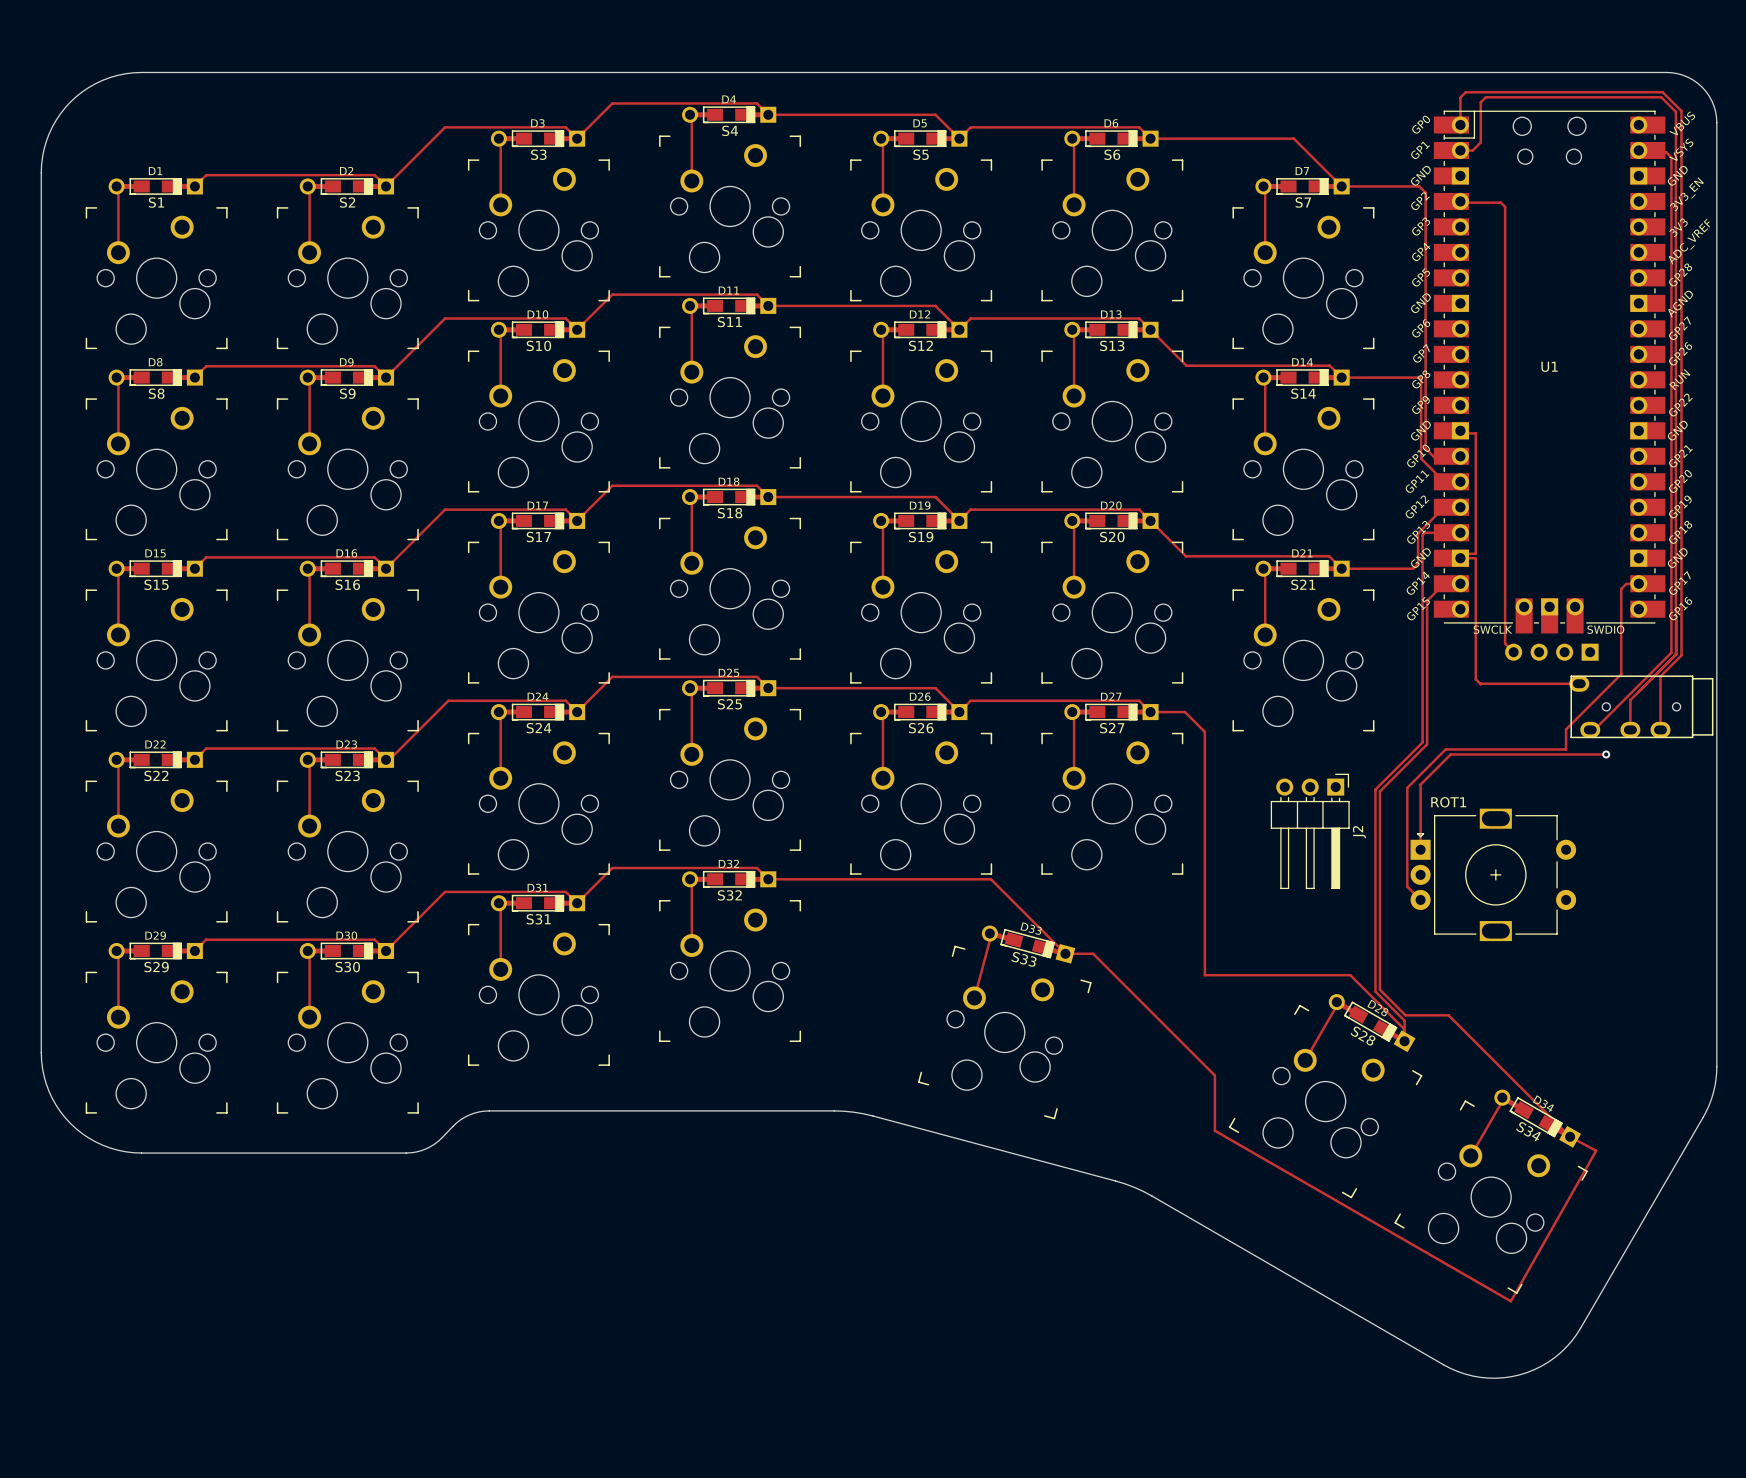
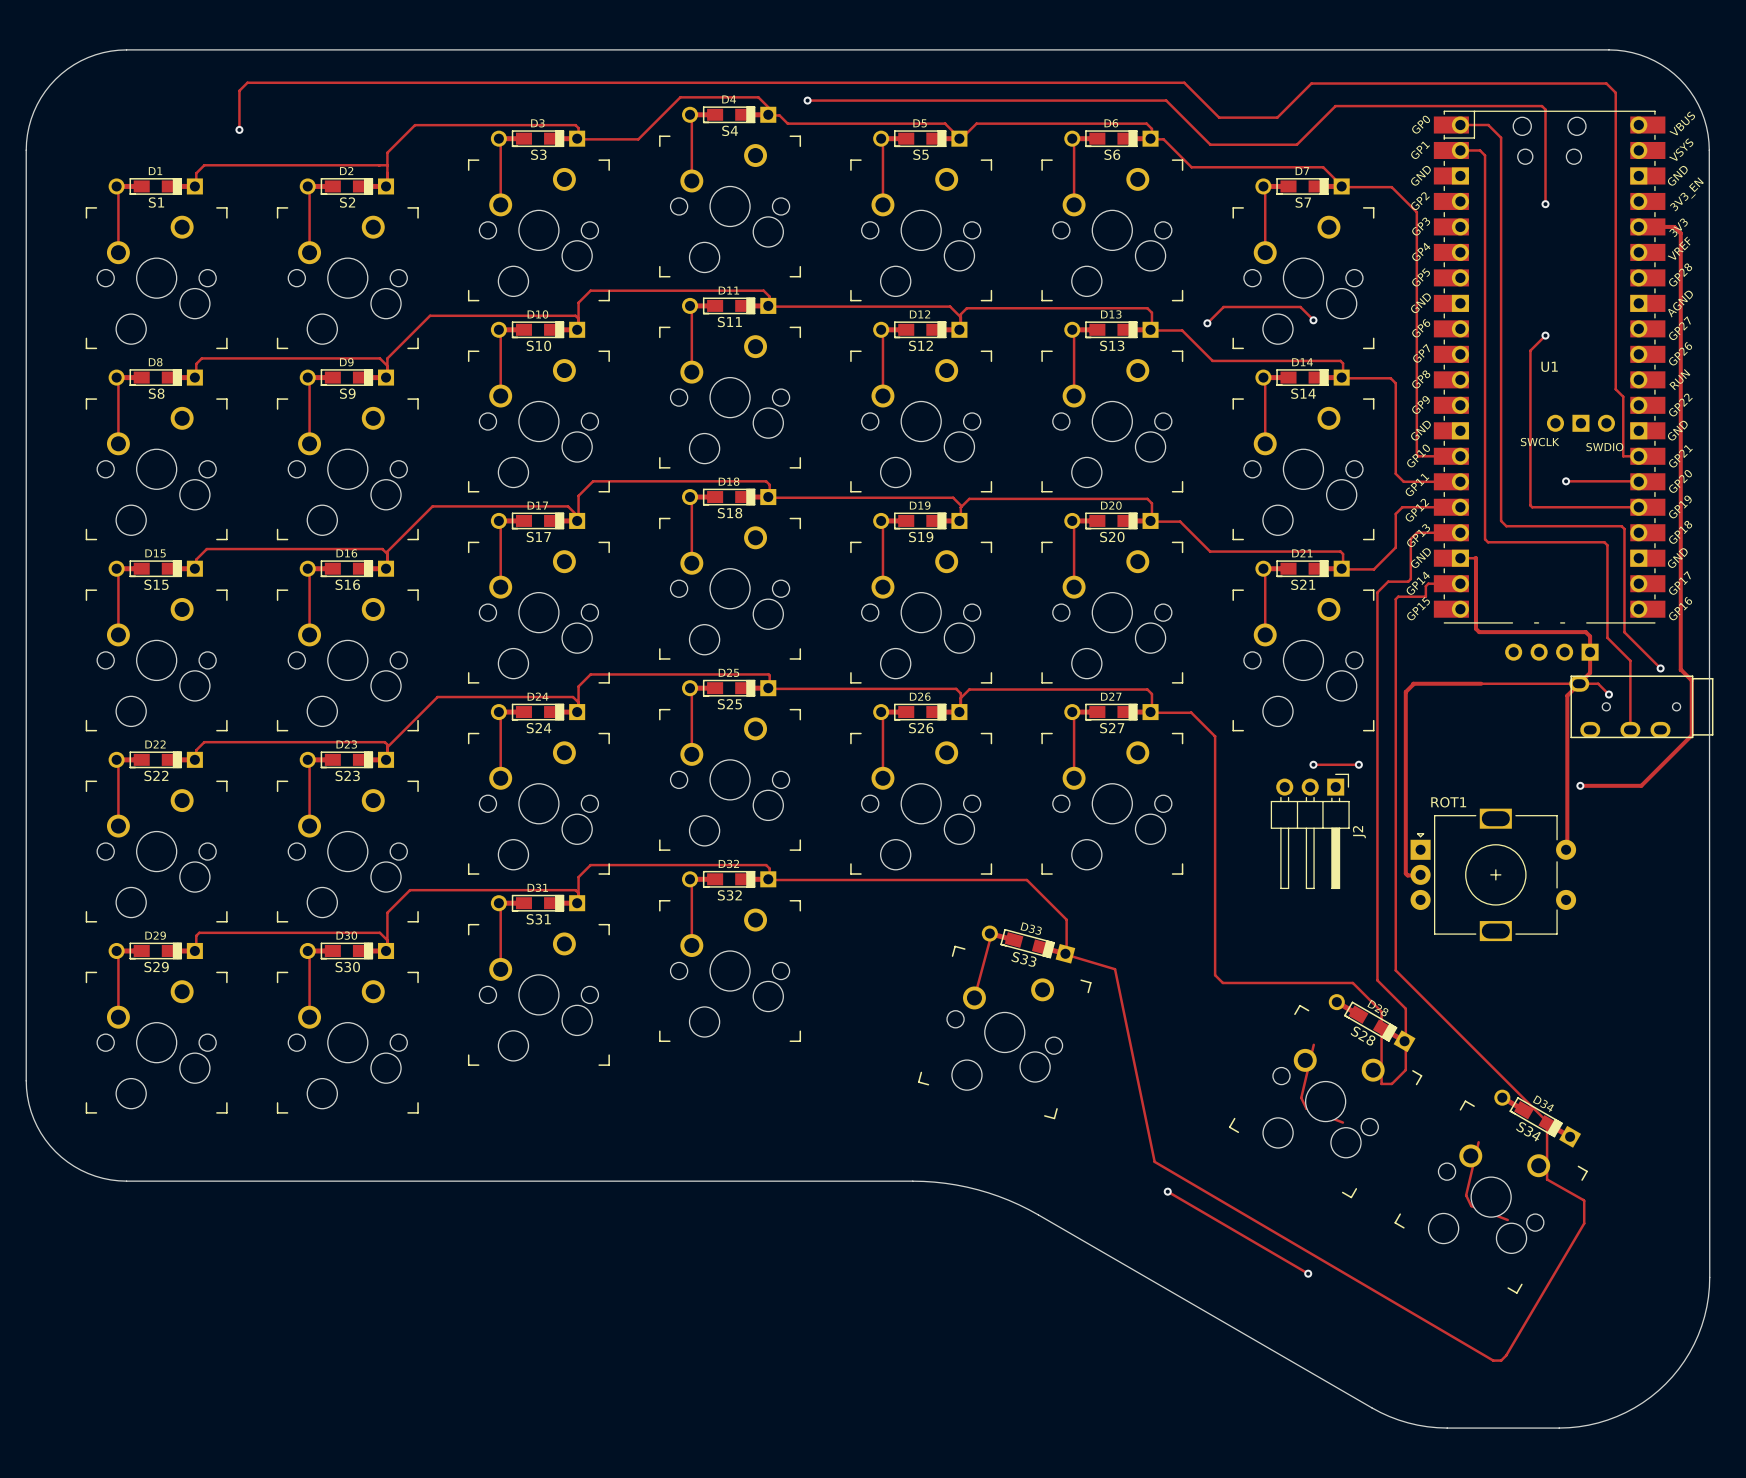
board edge: (141, 72) (1666, 72) (1683, 75) (1702, 87) (1711, 100) (1716, 122) (1715, 1079) (1711, 1099) (1703, 1117) (1580, 1328) (1566, 1347) (1541, 1366) (1519, 1374) (1488, 1378) (1465, 1374) (1443, 1364) (1134, 1187) (853, 1112) (484, 1111) (474, 1113) (460, 1119) (430, 1146) (416, 1152) (406, 1153) (133, 1152) (103, 1145) (76, 1129) (60, 1111) (48, 1091) (42, 1068) (41, 1052) (41, 164) (46, 141) (52, 127) (65, 107) (76, 96) (96, 83) (110, 77) (141, 72) -> (126, 49) (95, 54) (81, 60) (61, 73) (50, 85) (37, 104) (31, 119) (26, 142) (26, 1080) (29, 1104) (37, 1126) (50, 1145) (61, 1157) (88, 1173) (110, 1179) (126, 1181) (912, 1181) (945, 1183) (988, 1192) (1028, 1209) (1371, 1407) (1408, 1422) (1447, 1428) (1559, 1428) (1588, 1425) (1607, 1420) (1634, 1407) (1658, 1390) (1672, 1376) (1689, 1352) (1701, 1325) (1708, 1297) (1709, 1277) (1709, 150) (1708, 134) (1701, 111) (1690, 91) (1674, 73) (1654, 60) (1639, 54) (1608, 49) (126, 49)
track: none -> (807, 100) (1166, 100) (1210, 144) (1296, 144) (1335, 106) (1541, 106) (1545, 109) (1545, 204)
via: none -> (807, 100)
U1 footprint: [1433, 110, 1666, 634] -> [1433, 110, 1666, 624]
track: none -> (945, 123) (787, 123) (779, 115) (769, 115) (769, 108) (758, 97) (680, 97) (638, 139) (578, 139) (578, 128) (575, 125) (415, 125) (387, 152) (387, 187)
track: (1460, 125) (1460, 97) (1465, 92) (1662, 92) (1681, 110) (1681, 655) (1660, 676) (1660, 729) -> (1460, 125) (1488, 125) (1501, 137) (1501, 520) (1506, 526) (1621, 526) (1624, 529) (1624, 632) (1660, 668)
track: none -> (239, 129) (239, 90) (247, 82) (1184, 82) (1219, 117) (1277, 117) (1311, 83) (1606, 83) (1615, 92) (1615, 389) (1623, 396) (1623, 456) (1638, 456)
via: none -> (239, 129)
track: (1472, 150) (1480, 142) (1480, 102) (1485, 97) (1661, 97) (1675, 111) (1675, 654) -> (1472, 150) (1480, 150) (1485, 155) (1485, 539) (1488, 542) (1604, 542) (1607, 545) (1607, 637) (1630, 660) (1630, 700)
track: (1638, 150) (1640, 152) (1666, 152) (1671, 157) (1671, 652) (1594, 729) (1590, 729) -> none
track: none -> (387, 165) (204, 165) (196, 173) (196, 187)
track: (194, 186) (206, 175) (374, 175) (386, 186) (445, 127) (565, 127) (577, 138) (612, 103) (757, 103) (768, 114) (935, 114) (959, 138) (970, 127) (1139, 127) (1150, 138) (1293, 138) (1341, 186) (1419, 186) (1425, 192) (1425, 448) (1433, 456) -> (945, 123) (960, 139) (976, 123) (1146, 123) (1151, 128) (1151, 139) (1163, 139) (1191, 167) (1323, 167) (1343, 187) (1391, 187) (1416, 212) (1416, 454) (1433, 456)
track: (1460, 201) (1500, 202) (1505, 206) (1505, 643) (1513, 652) -> none
via: none -> (1545, 204)
track: none -> (1638, 226) (1674, 226) (1680, 233) (1680, 669) (1691, 680) (1691, 735) (1641, 785) (1580, 785)
track: none -> (960, 317) (950, 306) (769, 306) (769, 296) (763, 290) (590, 290) (578, 302) (578, 330)
track: none -> (578, 318) (575, 315) (430, 315) (387, 358) (387, 378)
track: none -> (1313, 320) (1300, 307) (1223, 307) (1207, 323)
via: none -> (1313, 320)
via: none -> (1207, 323)
track: none -> (1545, 335) (1530, 350) (1530, 505) (1532, 507) (1638, 507)
via: none -> (1545, 335)
track: none -> (387, 365) (379, 358) (201, 358) (196, 363) (196, 378)
track: (194, 377) (206, 366) (374, 366) (386, 377) (445, 318) (565, 318) (577, 329) (612, 294) (757, 294) (768, 305) (935, 305) (959, 329) (970, 318) (1139, 318) (1186, 365) (1329, 365) (1341, 377) (1420, 377) (1421, 458) (1444, 481) -> (960, 330) (960, 314) (966, 308) (1147, 308) (1151, 312) (1151, 330) (1182, 330) (1212, 360) (1340, 360) (1343, 363) (1343, 378) (1390, 378) (1395, 383) (1395, 473) (1403, 481) (1444, 481)
track: (1460, 430) (1463, 433) (1475, 433) (1475, 553) (1464, 553) (1460, 558) -> none
track: none -> (1566, 481) (1638, 481)
via: none -> (1566, 481)
track: none -> (961, 506) (953, 497) (769, 497) (769, 484) (766, 481) (593, 481) (578, 495) (578, 521)
track: (1444, 507) (1418, 533) (1418, 563) (1413, 568) (1341, 568) (1329, 556) (1185, 556) (1139, 509) (970, 509) (959, 520) (935, 497) (768, 497) (757, 485) (612, 485) (577, 520) (565, 509) (445, 509) (386, 568) (374, 557) (206, 557) (194, 568) -> (1444, 507) (1402, 507) (1395, 513) (1395, 547) (1373, 569)
track: none -> (578, 516) (568, 506) (432, 506) (387, 551) (387, 569)
track: none -> (960, 521) (960, 507) (969, 498) (1147, 498) (1151, 503) (1151, 521) (1180, 521) (1210, 551) (1340, 551) (1343, 554) (1343, 569) (1373, 569)
track: (1425, 532) (1422, 535) (1422, 742) (1375, 789) (1375, 991) (1404, 1020) (1404, 1041) -> (1425, 532) (1417, 532) (1410, 539) (1410, 579) (1408, 581) (1388, 581) (1377, 592) (1377, 980) (1405, 1008) (1405, 1070) (1391, 1083) (1381, 1083) (1381, 1011) (1352, 982) (1222, 982) (1215, 975) (1215, 736) (1191, 712)
track: none -> (387, 554) (382, 549) (206, 549) (196, 559) (196, 569)
track: (1475, 558) (1475, 679) (1481, 683) -> (1475, 558) (1475, 628) (1479, 632) (1585, 632) (1590, 636) (1590, 672) (1567, 695) (1567, 850)
track: (1444, 583) (1427, 600) (1427, 744) (1379, 791) (1379, 989) (1405, 1015) (1448, 1015) (1570, 1136) (1596, 1150) (1510, 1301) (1214, 1130) (1214, 1075) (1093, 953) (1065, 953) (990, 879) (768, 879) (757, 868) (612, 868) (577, 903) (565, 891) (445, 891) (386, 950) (374, 939) (206, 939) (194, 950) -> (1444, 583) (1428, 583) (1425, 586) (1425, 596) (1398, 596) (1395, 599) (1395, 970) (1547, 1121) (1547, 1179) (1584, 1200) (1584, 1223) (1506, 1355) (1501, 1360) (1493, 1360) (1154, 1161) (1115, 969) (1066, 954) (1066, 919) (1026, 880) (769, 880) (769, 868) (766, 865) (590, 865) (578, 877) (578, 903)
track: (1638, 583) (1626, 583) (1621, 588) (1621, 674) (1566, 729) (1566, 749) (1445, 749) (1407, 787) (1407, 886) (1420, 899) -> none
track: (1676, 619) (1676, 654) (1630, 700) -> none
via: none -> (1660, 668)
track: none -> (1481, 683) (1413, 683) (1405, 692) (1405, 873) (1407, 875) (1421, 875)
track: none -> (1579, 683) (1598, 683) (1608, 694)
via: none -> (1608, 694)
track: none -> (960, 698) (969, 689) (1147, 689) (1151, 694) (1151, 712) (1191, 712)
track: none -> (578, 702) (573, 697) (437, 697) (387, 747)
track: none -> (578, 712) (578, 686) (590, 674) (768, 674) (769, 688) (956, 688) (960, 693) (960, 712)
track: (1606, 754) (1450, 754) (1420, 784) (1420, 849) -> none
via: (1606, 754) -> none
track: (194, 759) (206, 748) (374, 748) (387, 762) (448, 700) (565, 700) (577, 712) (612, 676) (757, 676) (768, 688) (935, 688) (959, 712) (970, 700) (1139, 700) (1150, 712) (1185, 712) (1204, 731) (1204, 975) (1350, 975) (1404, 1029) -> none
track: none -> (196, 760) (196, 750) (204, 742) (384, 742) (387, 744) (387, 760)
track: none -> (1313, 764) (1358, 764)
via: none -> (1313, 764)
via: none -> (1358, 764)
via: none -> (1580, 785)
track: none -> (578, 893) (575, 890) (410, 890) (387, 912) (387, 951)
track: none -> (387, 940) (379, 932) (199, 932) (196, 935) (196, 951)
track: (1338, 1003) (1305, 1060) -> none
track: none -> (1313, 1044) (1301, 1097) (1306, 1108) (1342, 1122)
track: (1503, 1098) (1470, 1155) -> none
track: none -> (1478, 1142) (1466, 1195) (1471, 1206) (1507, 1220)
track: none -> (1167, 1191) (1308, 1273)
via: none -> (1167, 1191)
via: none -> (1308, 1273)

